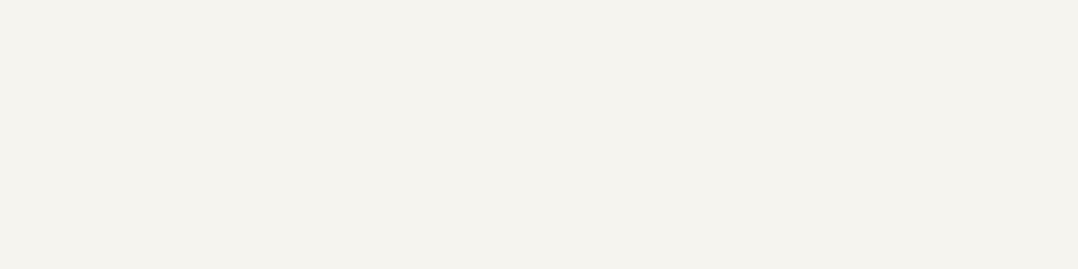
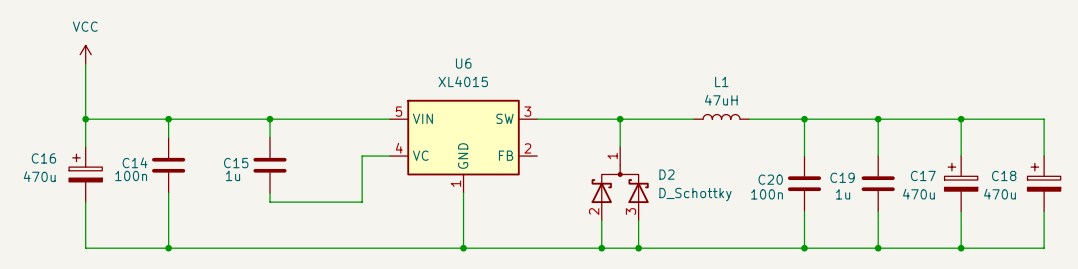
power symbol: none -> VCC (85, 54)
wire: none -> (85, 63) (85, 146)
L1: none -> 47uH (721, 116)
wire: none -> (85, 119) (389, 119)
junction: none -> (85, 119)
wire: none -> (168, 119) (168, 137)
junction: none -> (168, 119)
wire: none -> (269, 119) (269, 137)
junction: none -> (269, 119)
wire: none -> (537, 119) (693, 119)
wire: none -> (620, 119) (620, 146)
junction: none -> (620, 119)
wire: none -> (749, 119) (1044, 119) (1044, 156)
wire: none -> (804, 119) (804, 156)
junction: none -> (804, 119)
wire: none -> (878, 119) (878, 156)
junction: none -> (878, 119)
wire: none -> (961, 119) (961, 156)
junction: none -> (961, 119)
U6: none -> XL4015 (463, 146)
wire: none -> (389, 156) (362, 156) (362, 202) (269, 202) (269, 192)
C14: none -> 100n (168, 165)
C15: none -> 1u (269, 165)
C16: none -> 470u (85, 174)
D2: none -> D_Schottky (620, 183)
C20: none -> 100n (804, 183)
C19: none -> 1u (878, 183)
C17: none -> 470u (961, 183)
C18: none -> 470u (1044, 183)
wire: none -> (168, 192) (168, 248)
wire: none -> (463, 192) (463, 248)
wire: none -> (85, 202) (85, 248) (1044, 248) (1044, 211)
wire: none -> (804, 211) (804, 248)
wire: none -> (878, 211) (878, 248)
wire: none -> (961, 211) (961, 248)
wire: none -> (601, 220) (601, 248)
wire: none -> (638, 220) (638, 248)
junction: none -> (168, 248)
junction: none -> (463, 248)
junction: none -> (601, 248)
junction: none -> (638, 248)
junction: none -> (804, 248)
junction: none -> (878, 248)
junction: none -> (961, 248)

